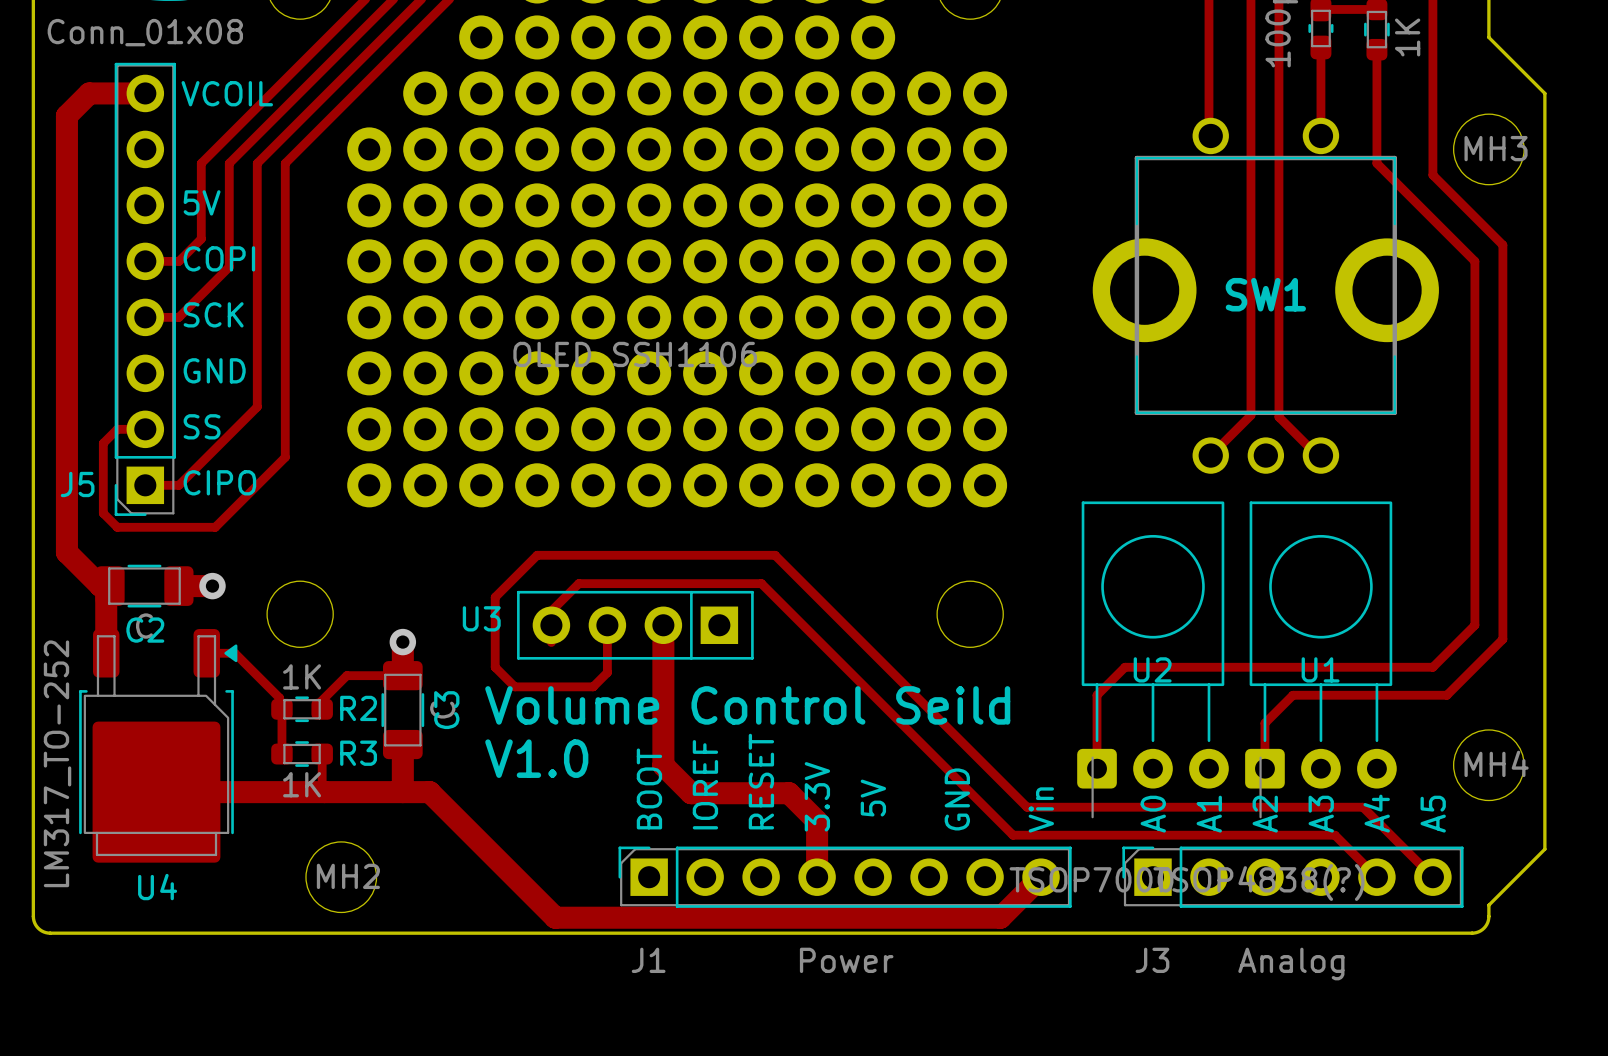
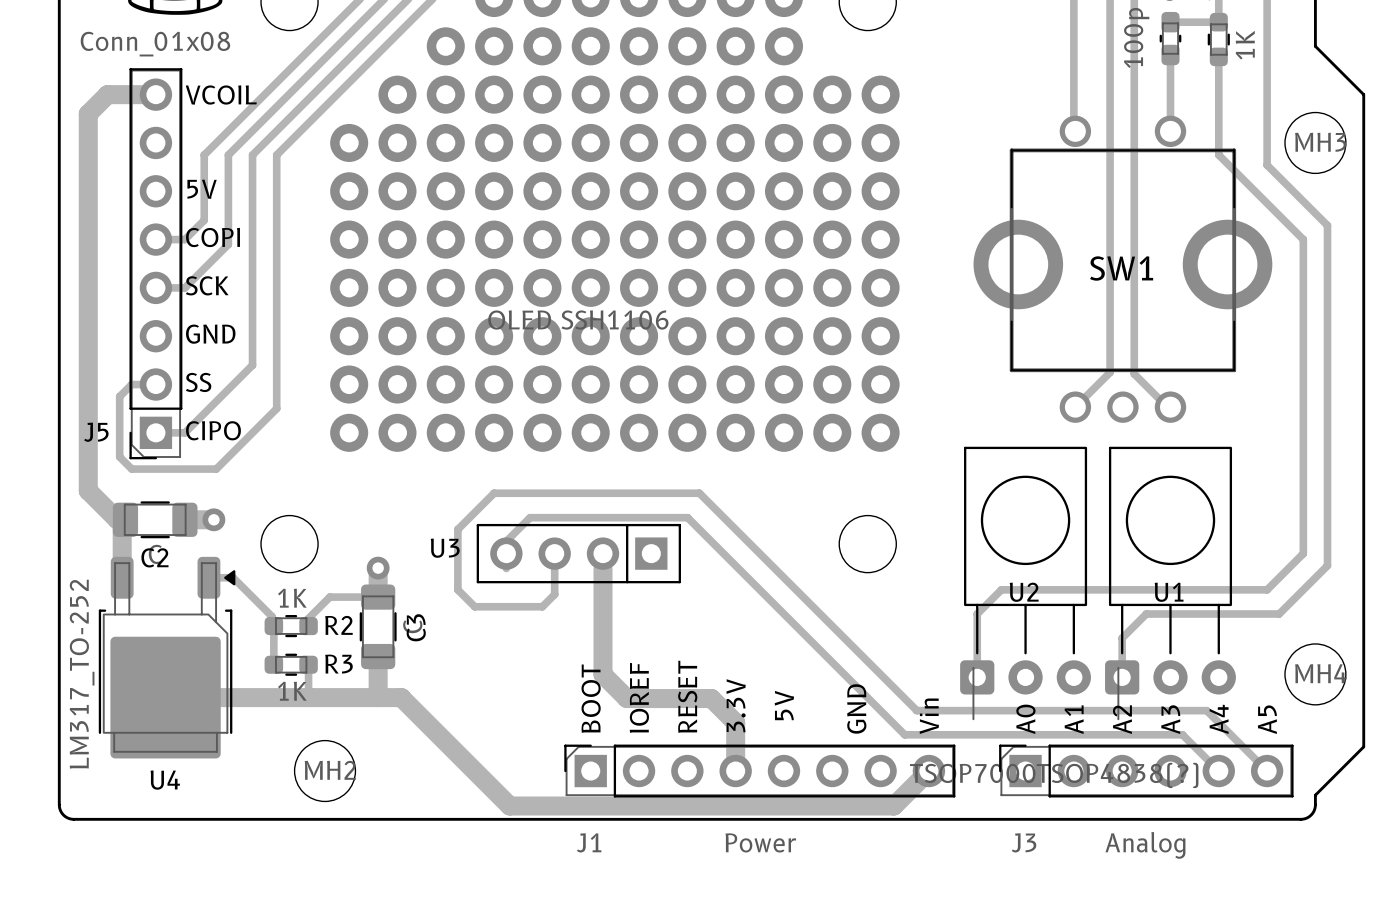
text: Volume Control Seild (747, 705) -> none
text: V1.0 (536, 758) -> none

